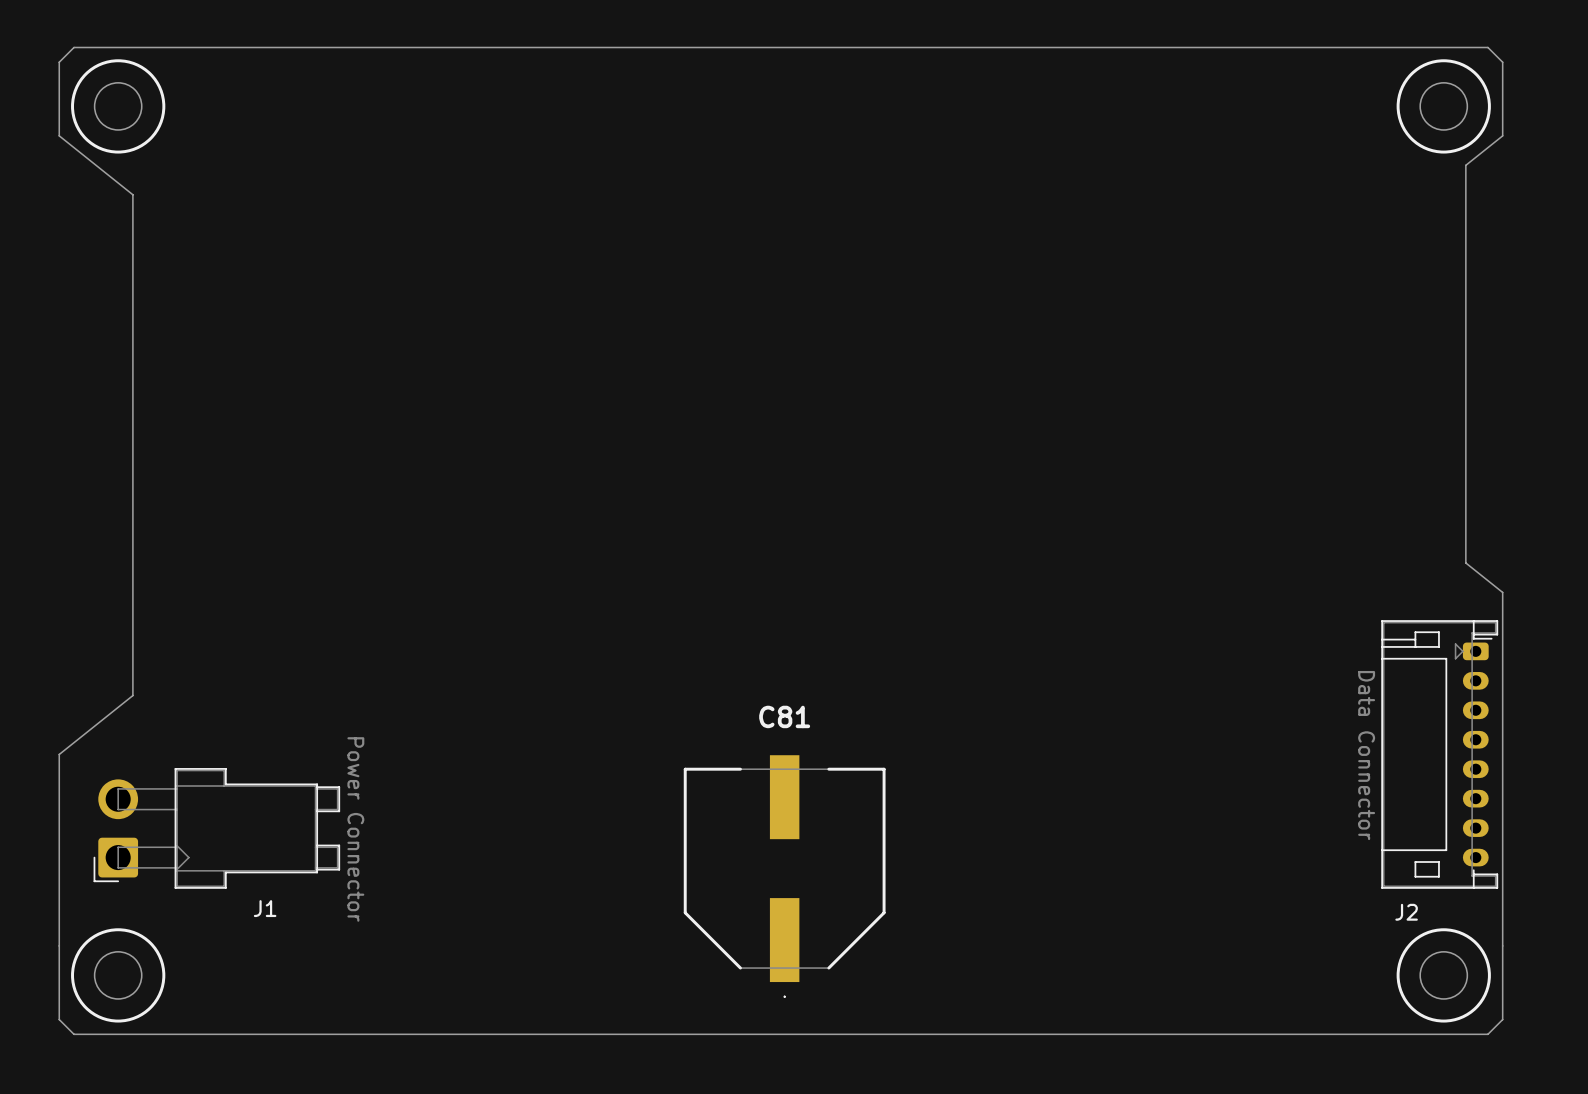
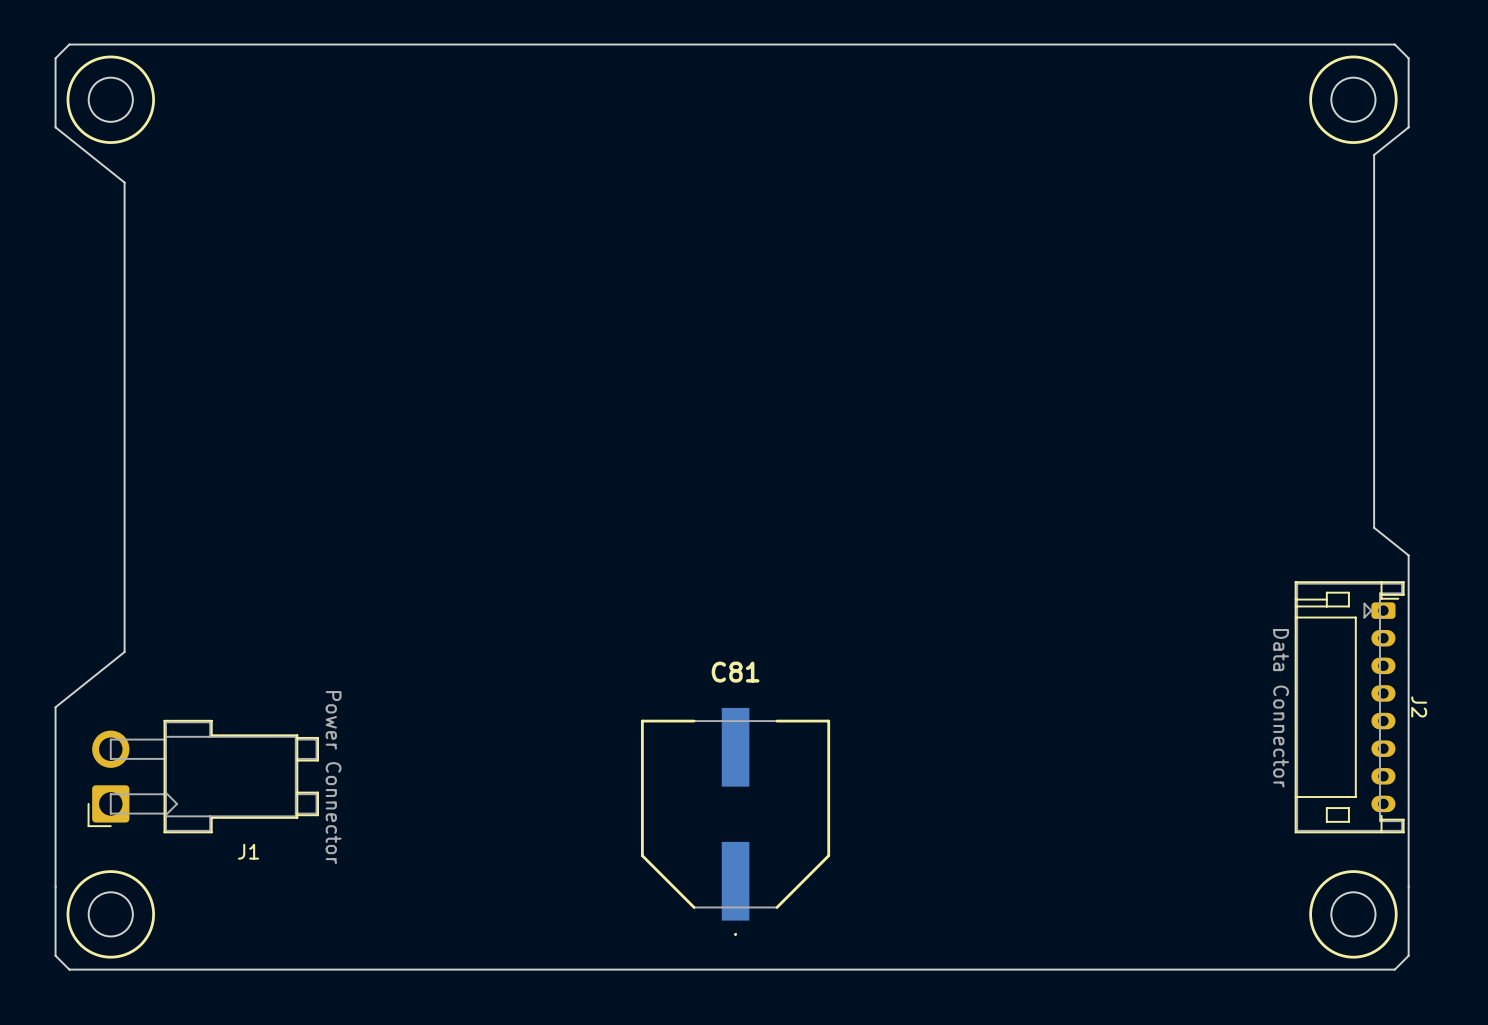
J2 name rotation: 0° (1406, 912) -> 90° clockwise (1419, 706)
J2 name position: J2 (1406, 912) -> J2 (1419, 706)

